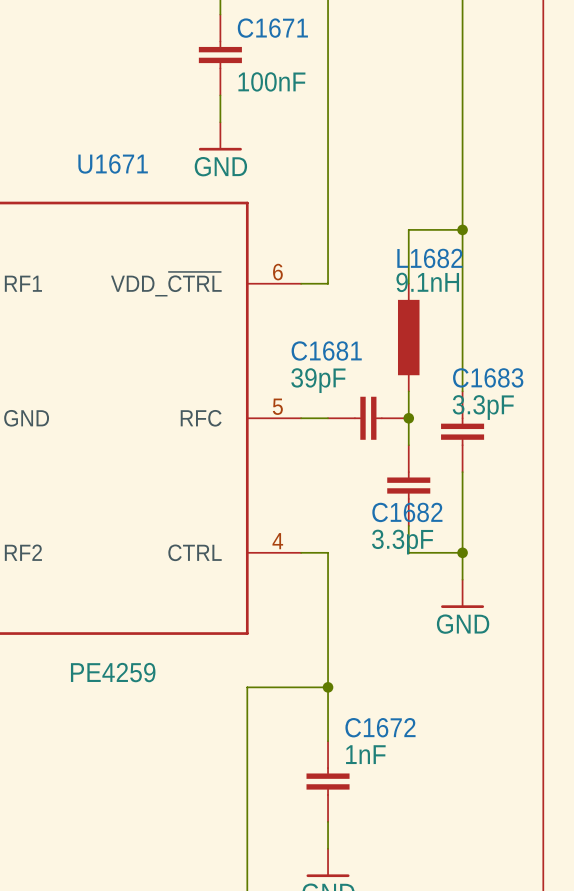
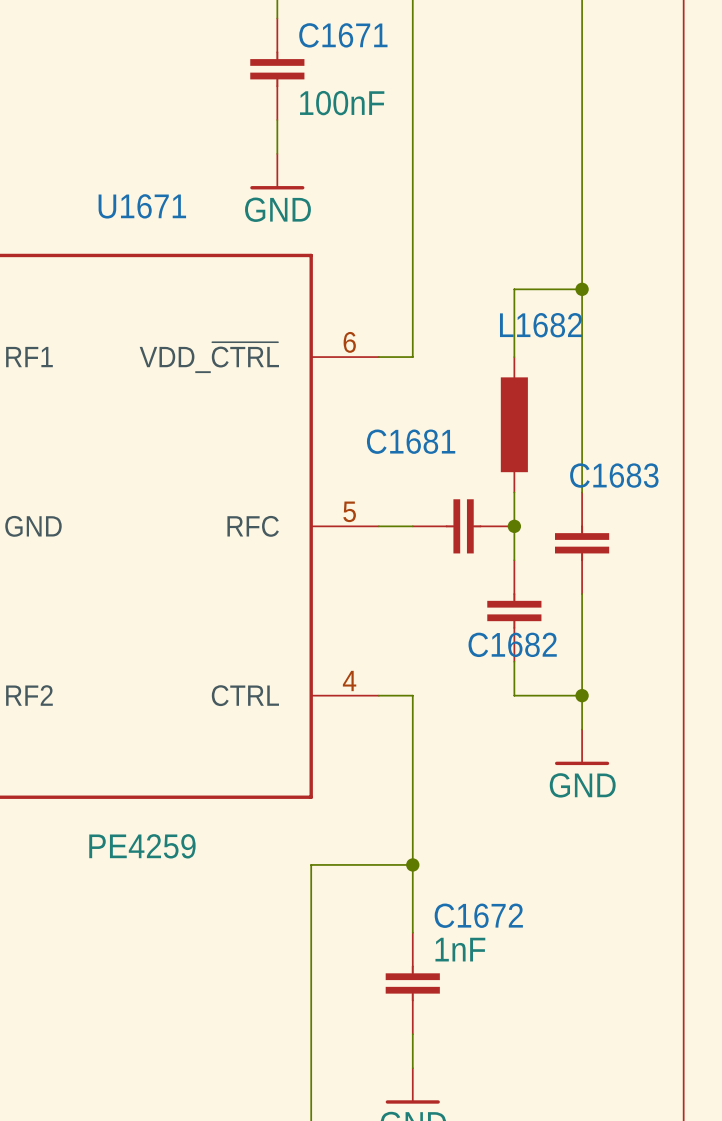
L1682 value: 9.1nH (427, 282) -> none
C1681 value: 39pF (318, 380) -> none
C1683 value: 3.3pF (483, 407) -> none
C1682 value: 3.3pF (402, 542) -> none

